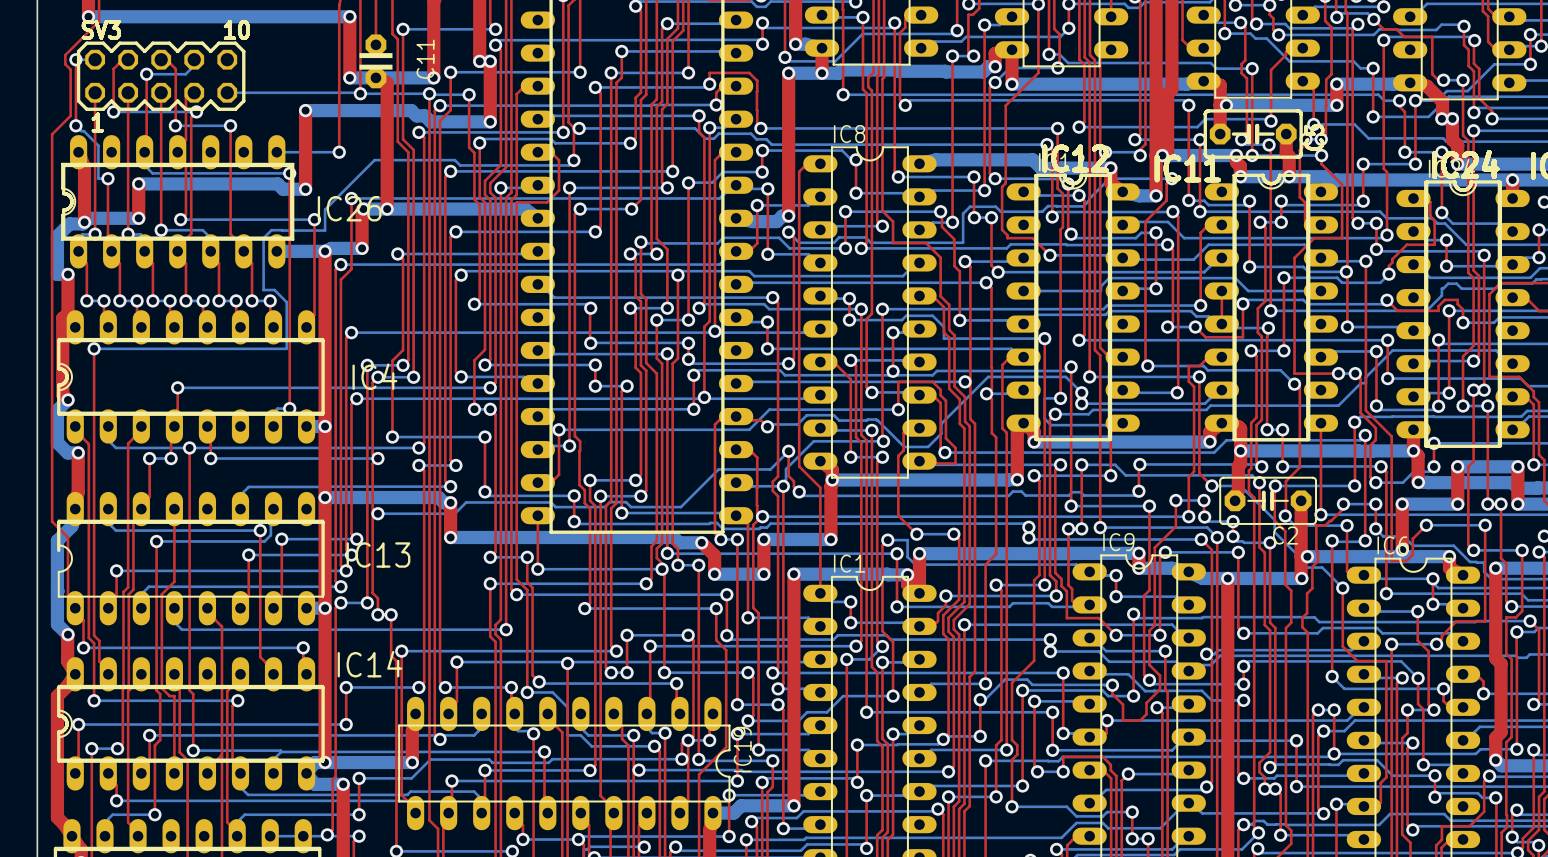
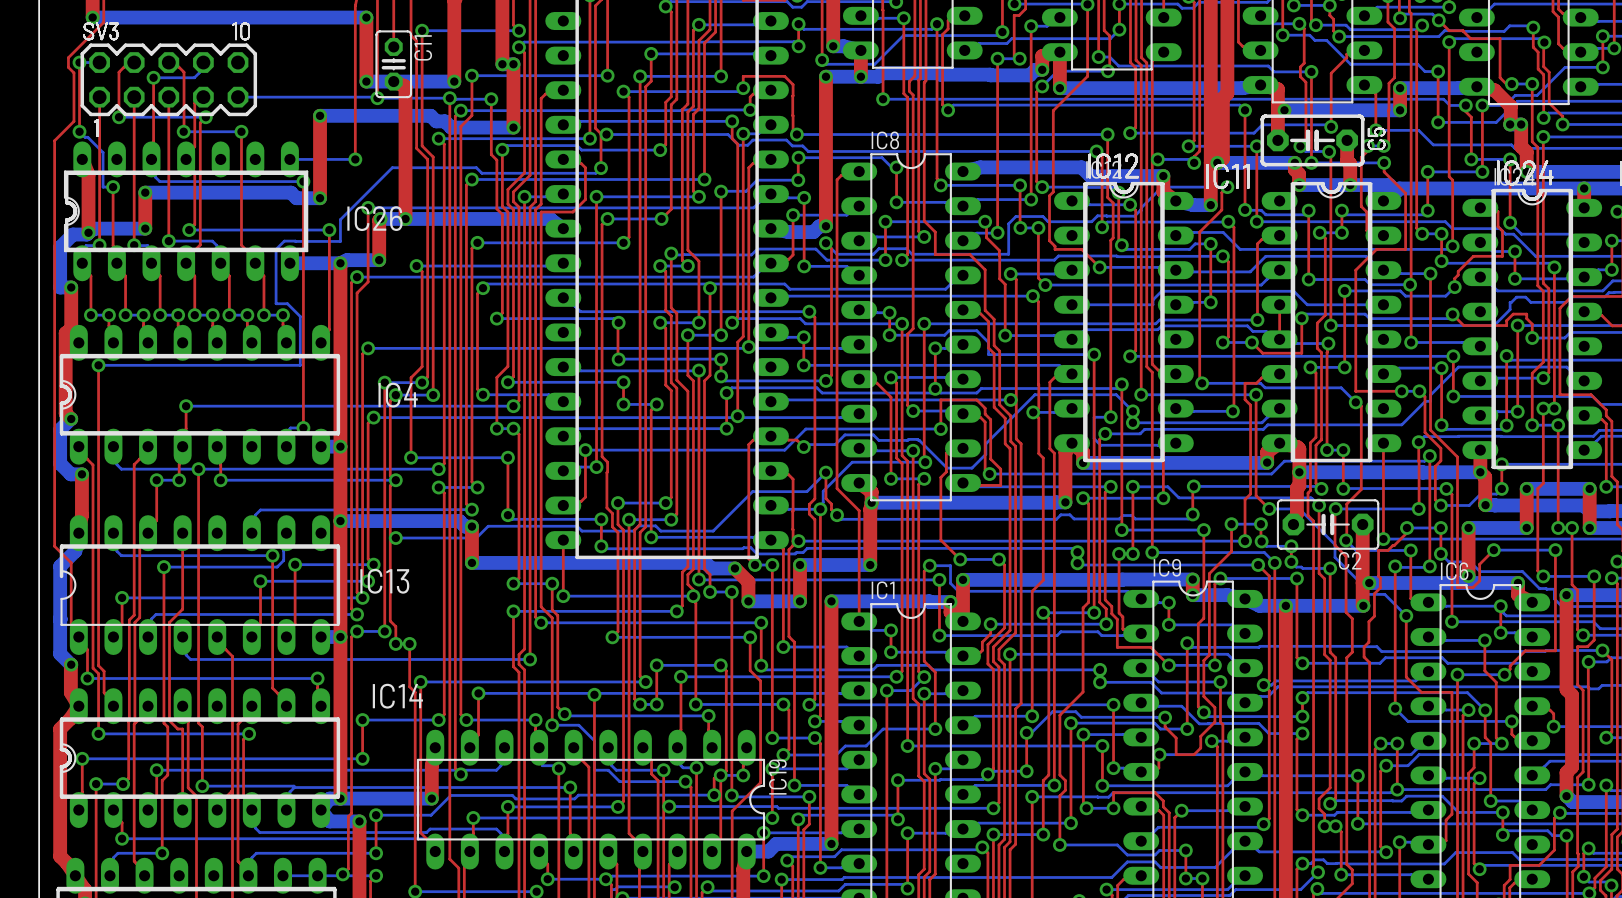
C11 footprint: [359, 34, 393, 89] -> [375, 30, 413, 99]

